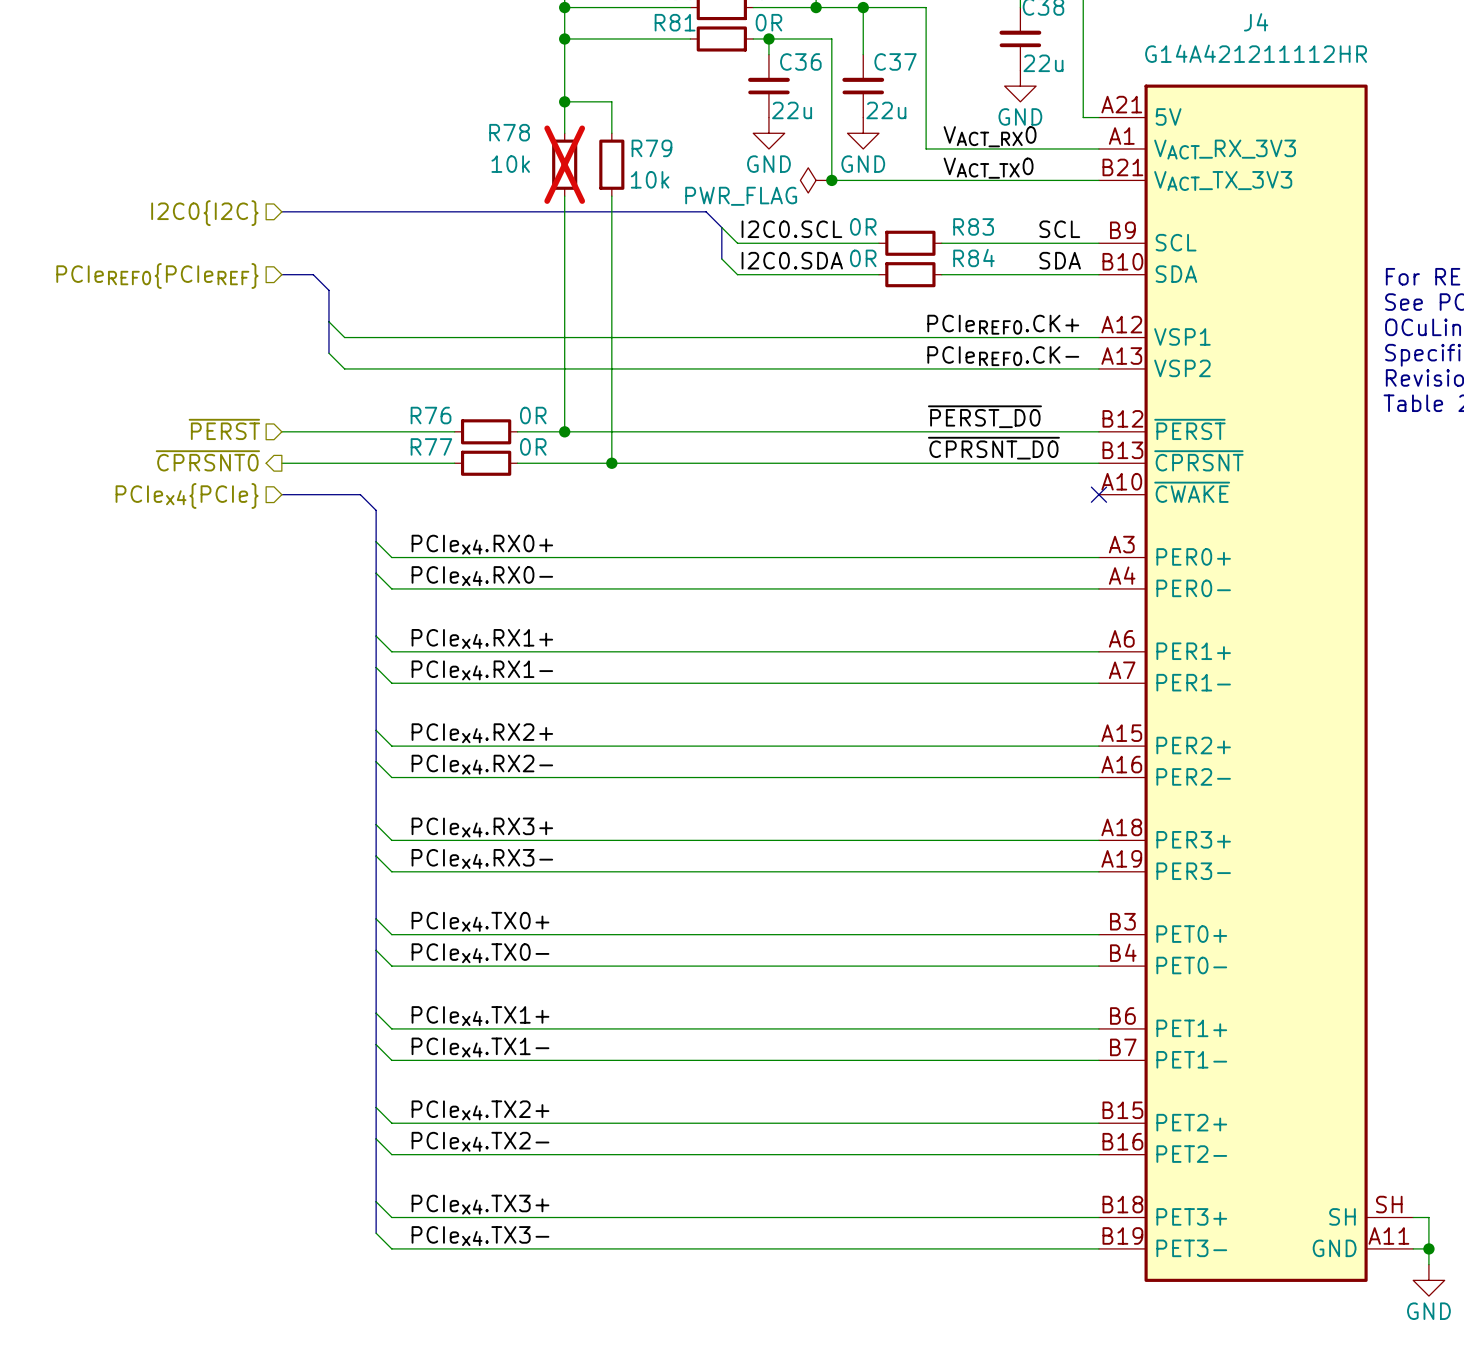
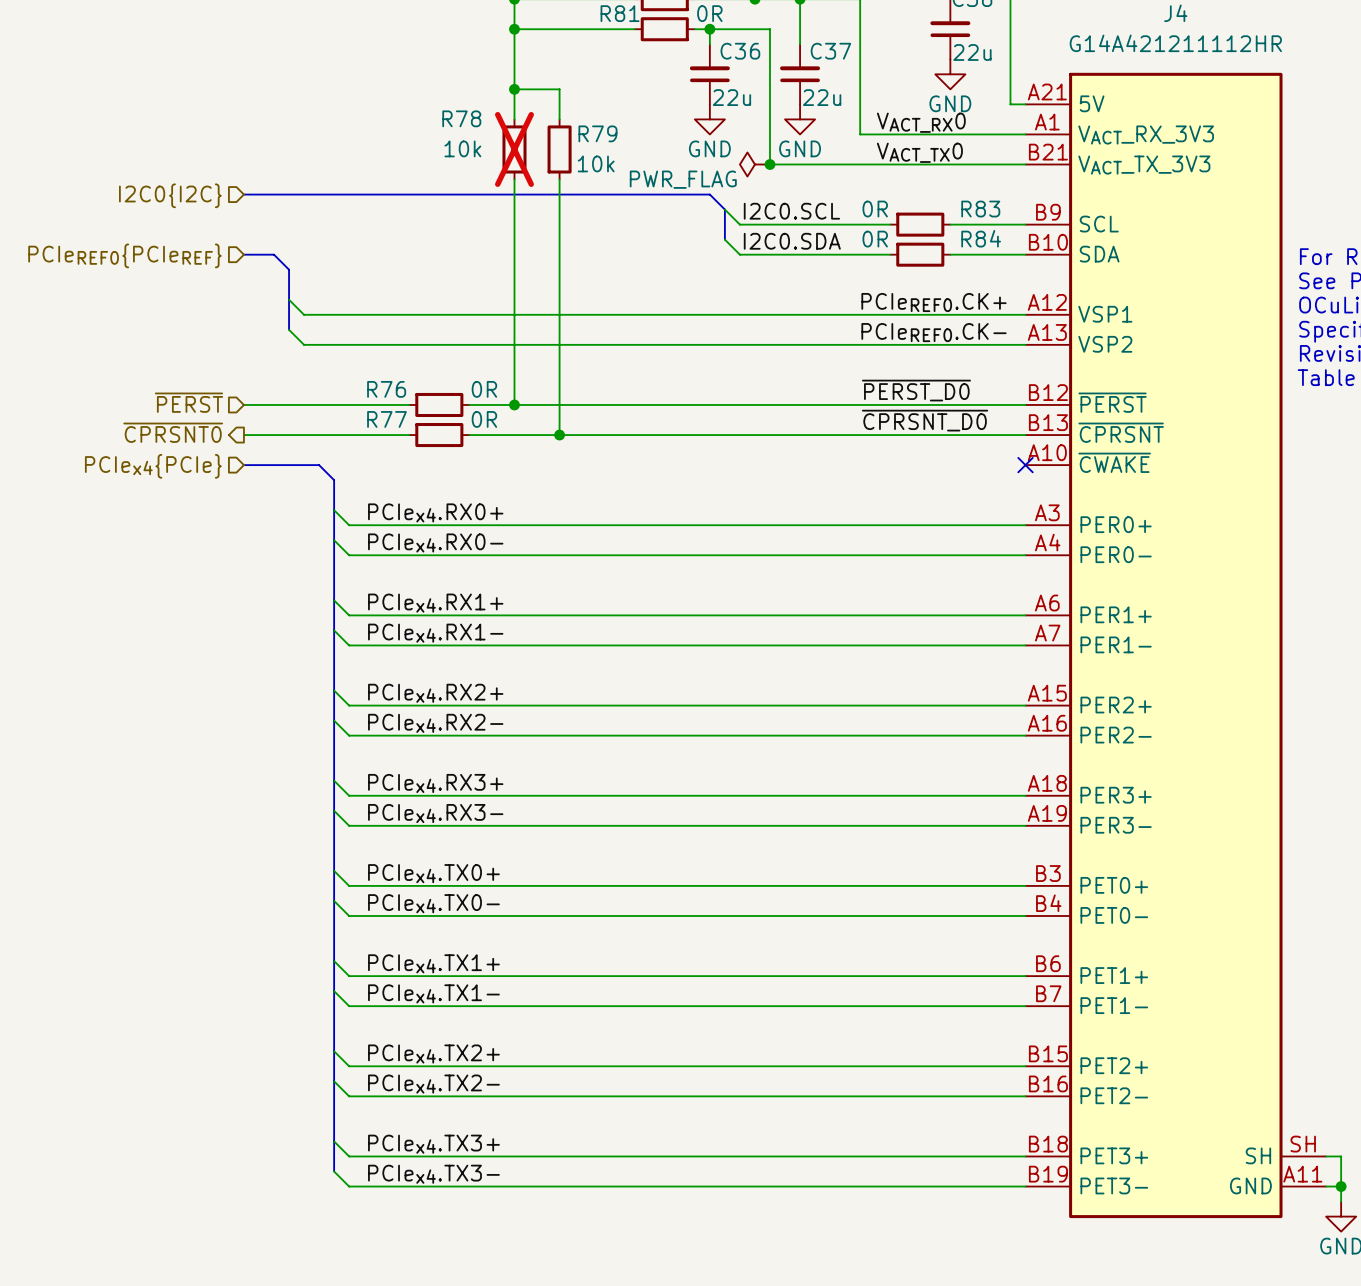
bus: (706, 211) (721, 227) (721, 258) -> (649, 194) (709, 194) (724, 209) (724, 239)
wire: (721, 227) (737, 243) (800, 243) -> (724, 209) (739, 224)
label position: I2C0.SCL (791, 229) -> I2C0.SCL (791, 211)
label: SCL (1059, 229) -> none
R83 position: (910, 243) -> (920, 224)
wire: (957, 243) (1020, 243) -> (815, 224) (875, 224)
wire: (721, 258) (737, 274) (800, 274) -> (724, 239) (739, 254)
label position: I2C0.SDA (792, 260) -> I2C0.SDA (792, 241)
label: SDA (1060, 260) -> none
R84 position: (910, 274) -> (920, 254)
wire: (957, 274) (1020, 274) -> (815, 254) (875, 254)

